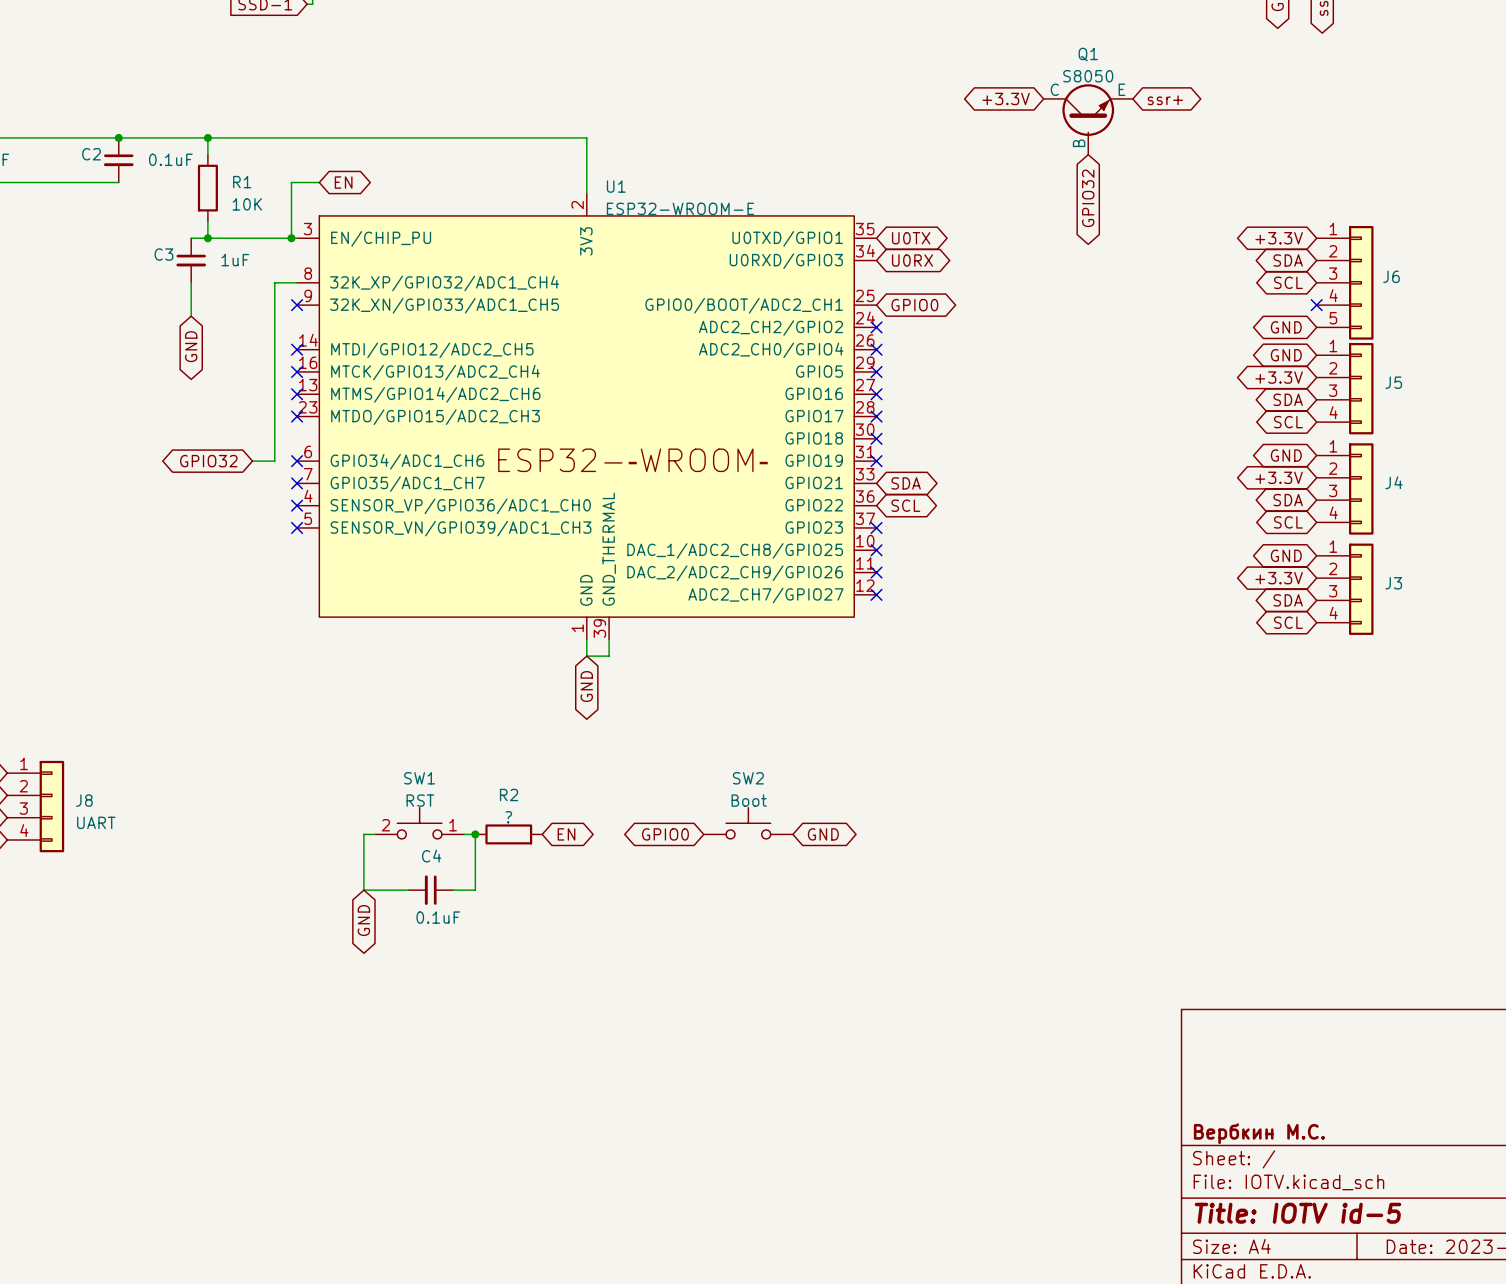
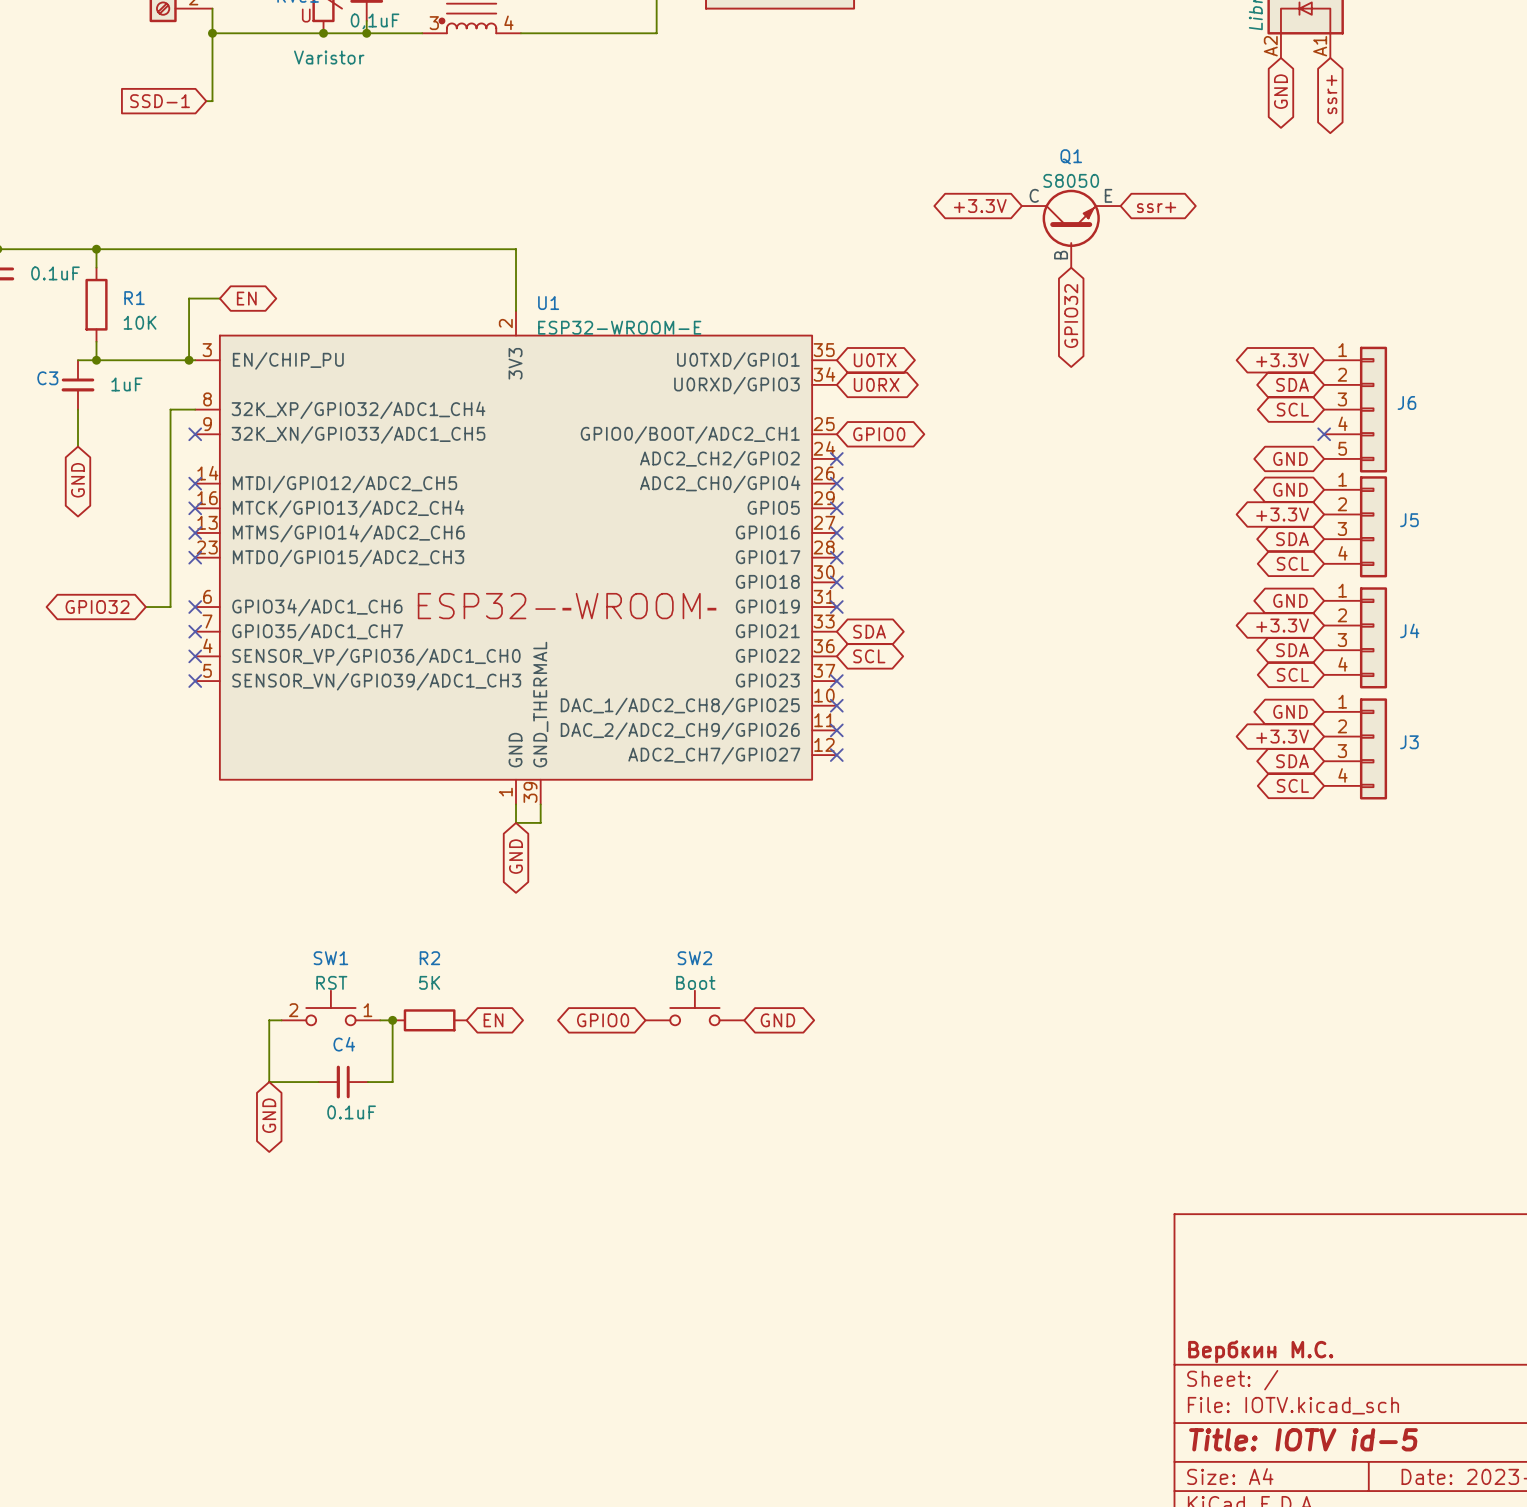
R2 name position: R2 (509, 795) -> R2 (429, 958)
R2 value: ? (508, 817) -> 5K (429, 982)

